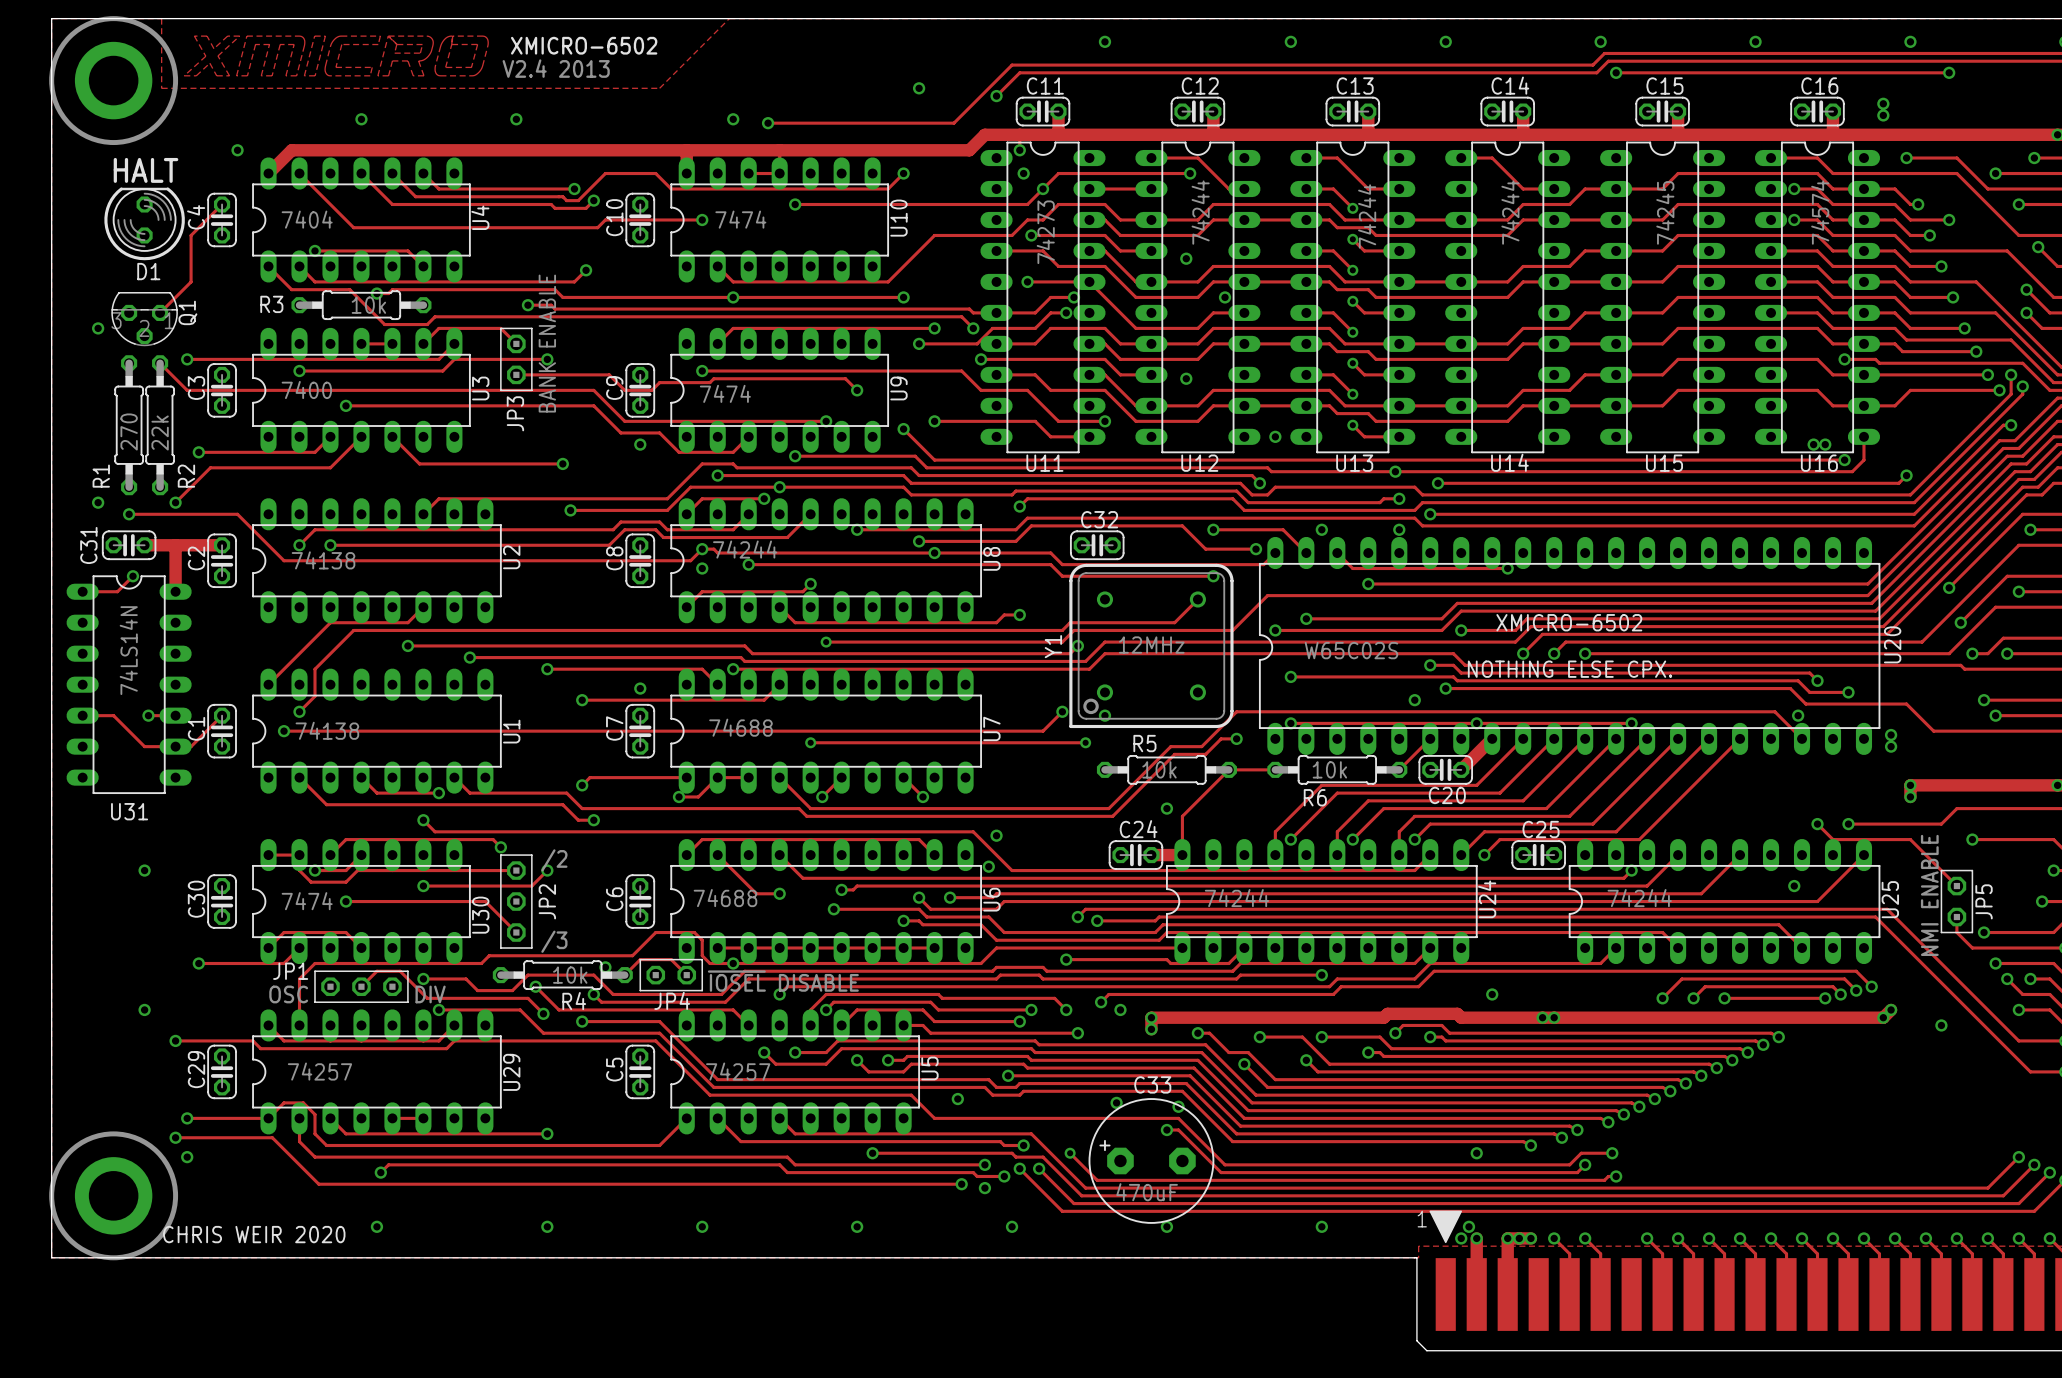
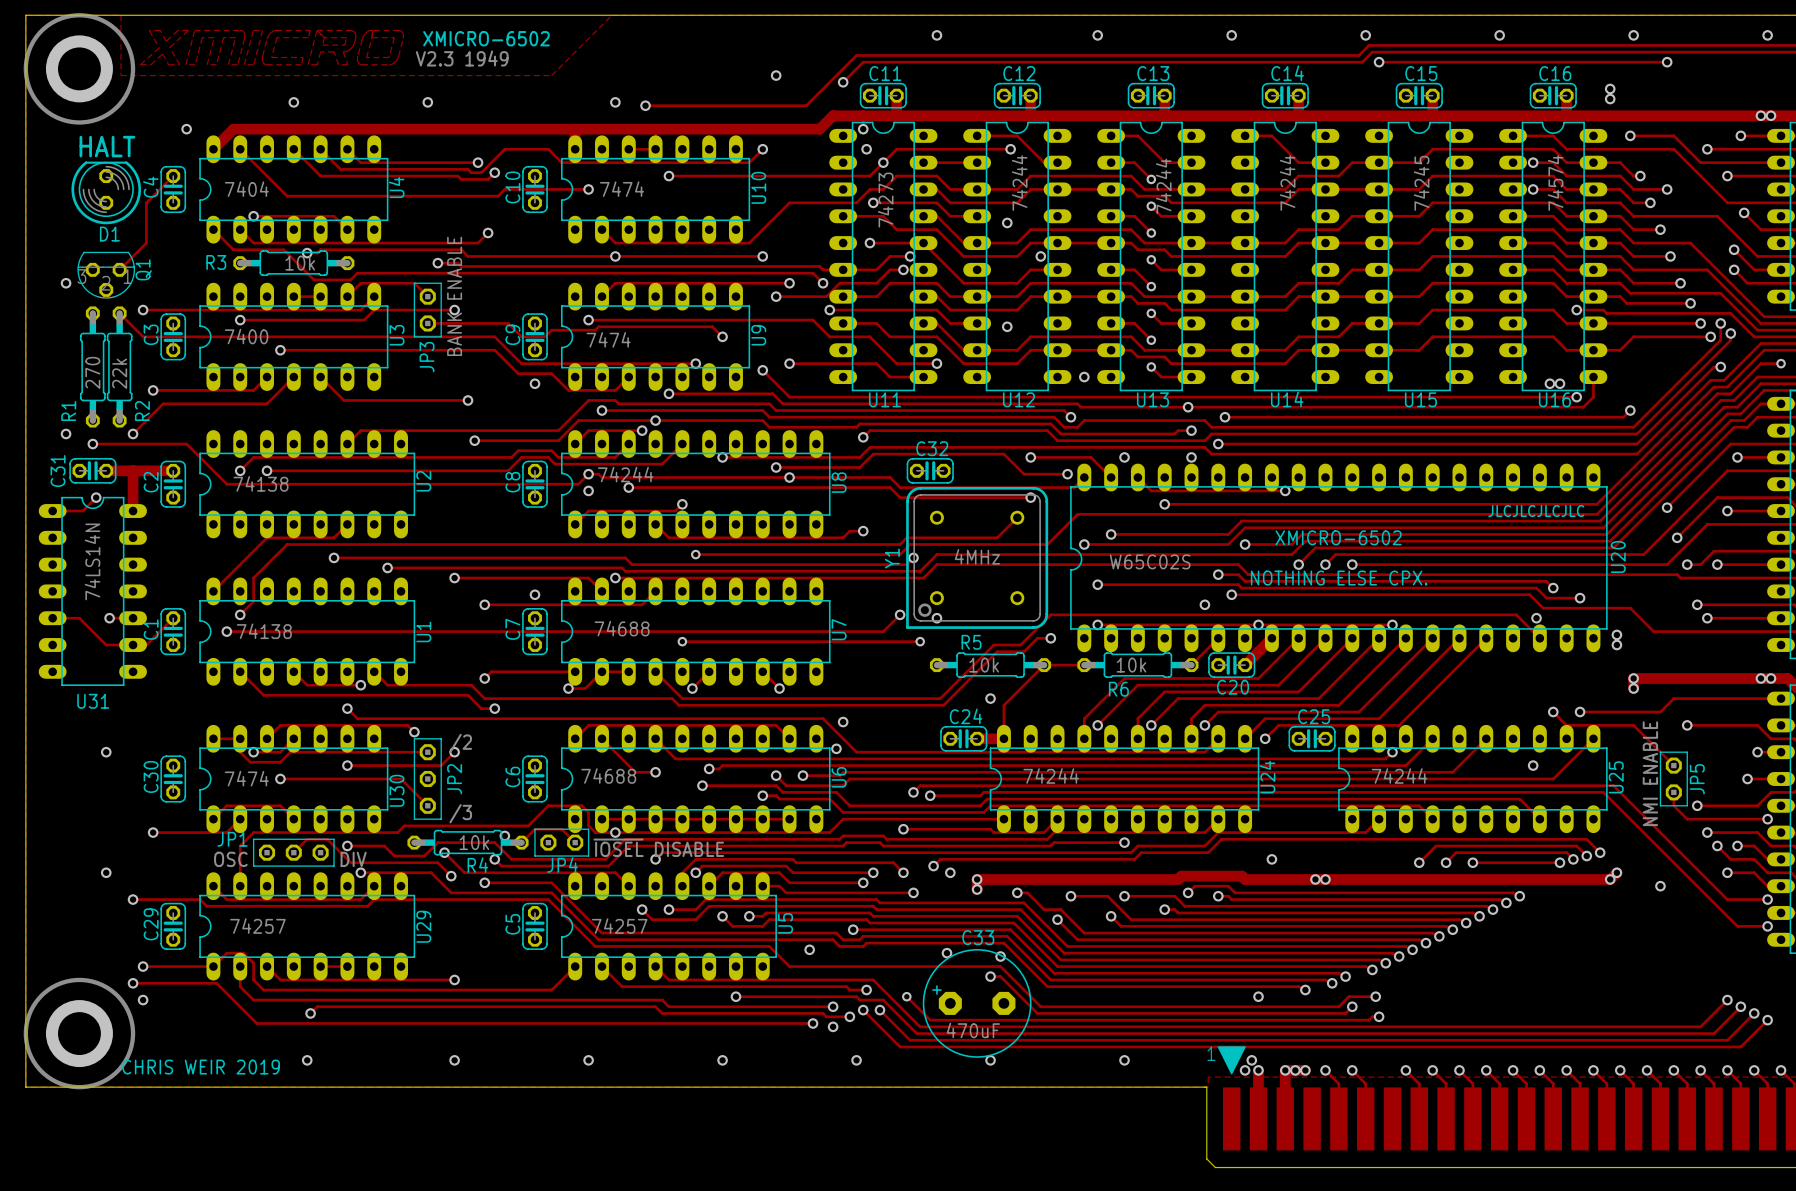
text: V2.4 2013 (556, 68) -> V2.3 1949 (462, 58)
text: none -> JLCJLCJLCJLC (1536, 511)
Y1 value: 12MHz (1151, 645) -> 4MHz (977, 556)
text: CHRIS WEIR 2020 (254, 1234) -> CHRIS WEIR 2019 (201, 1067)

